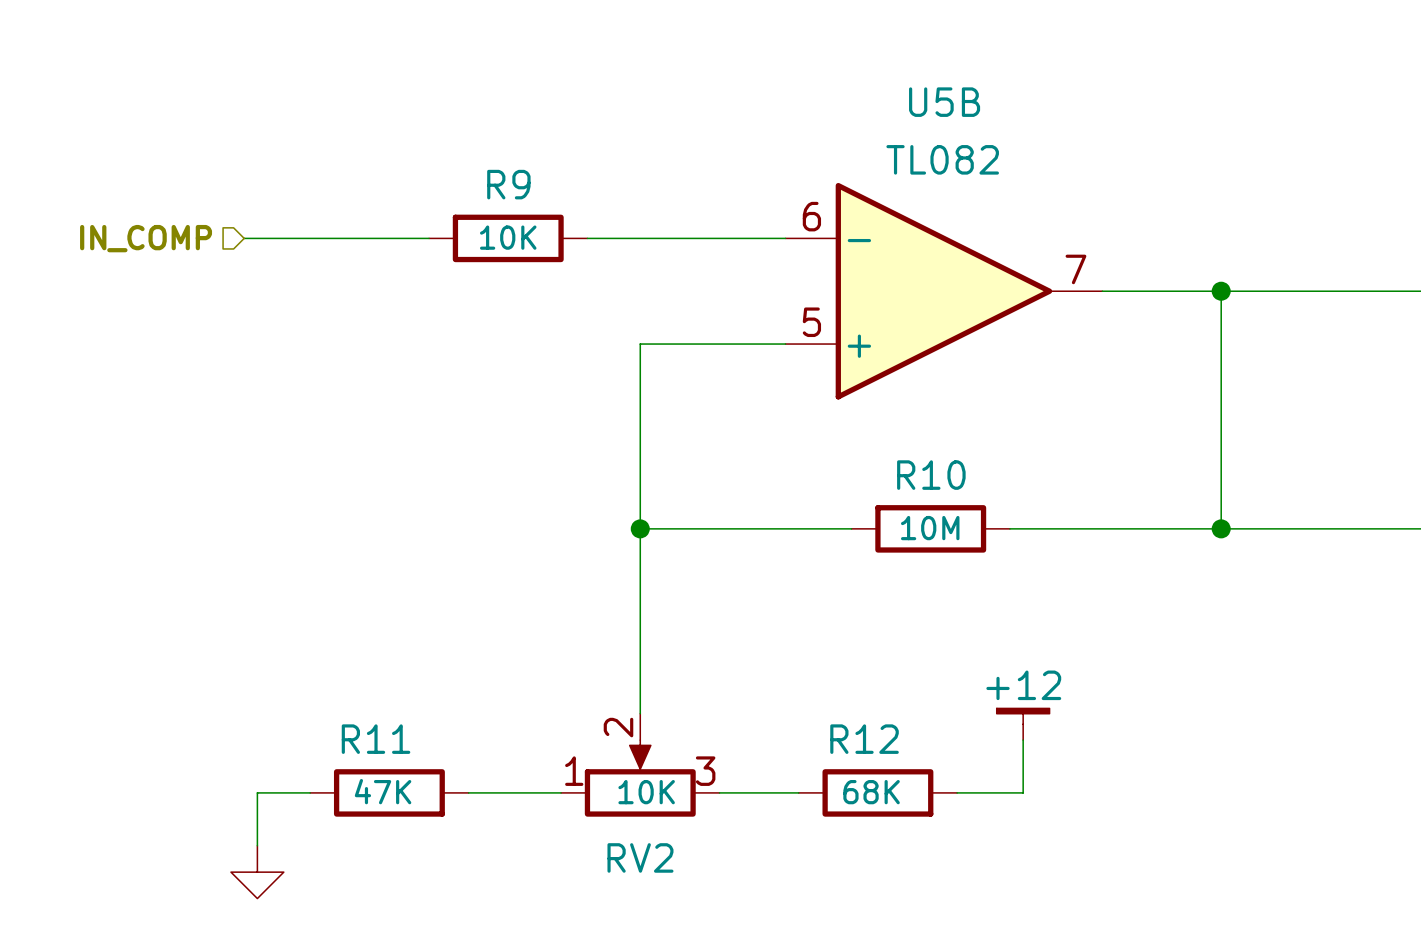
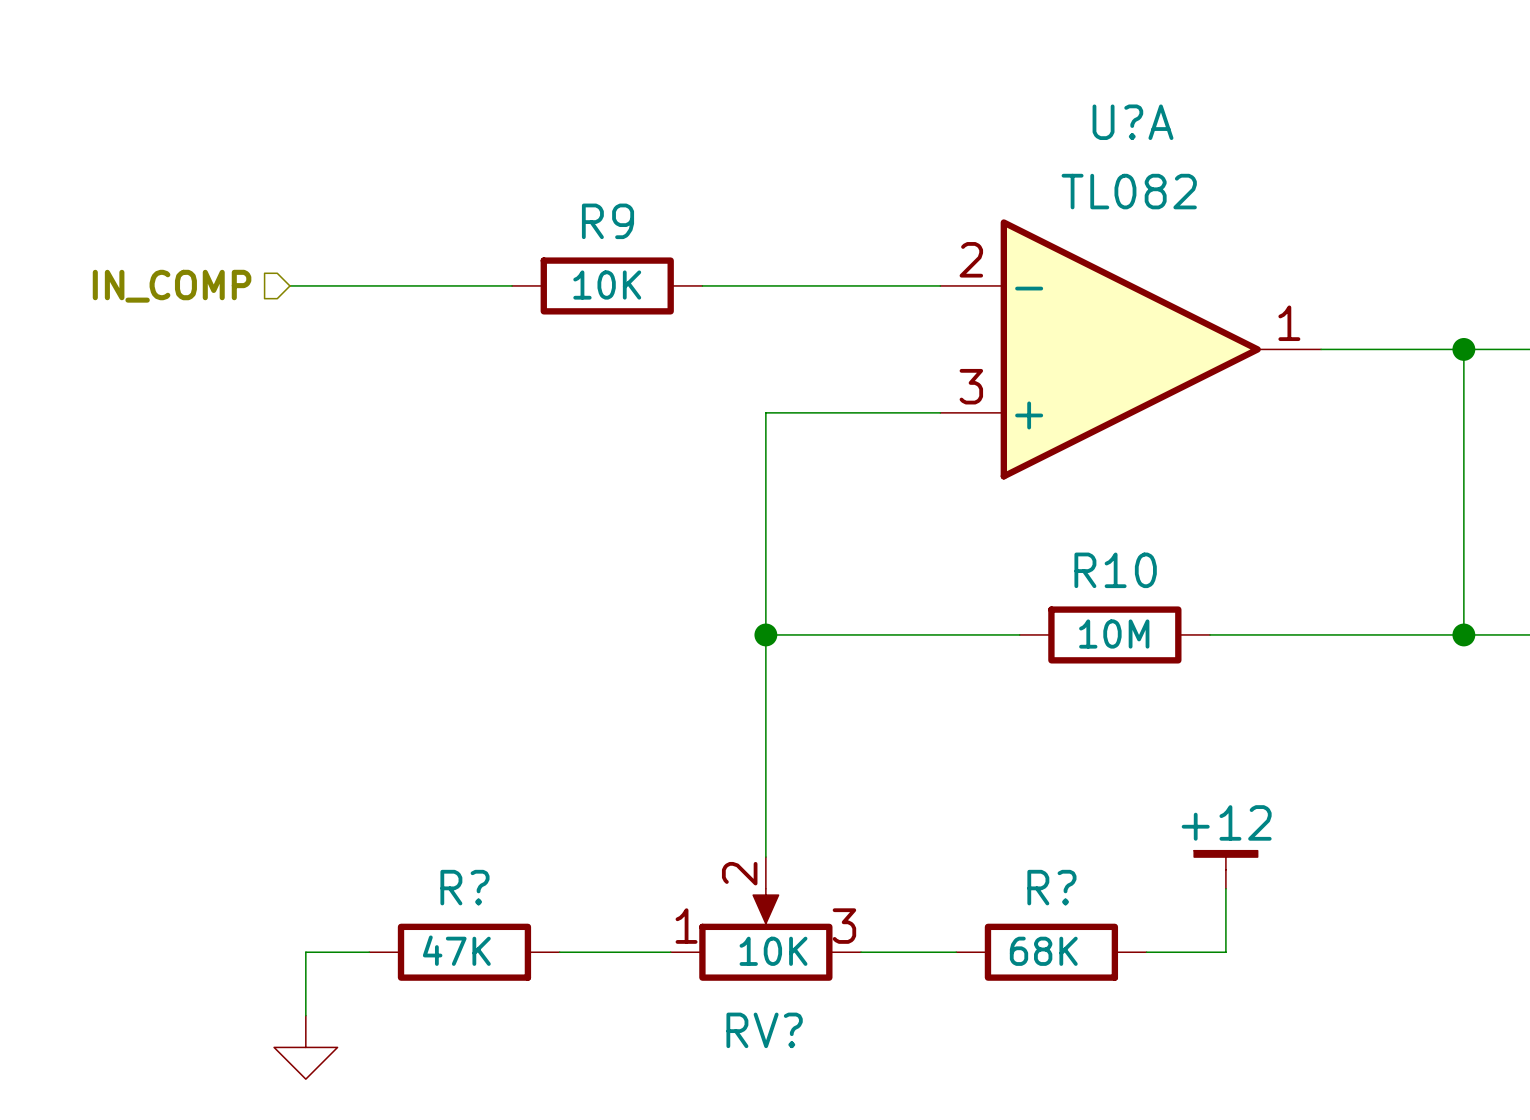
U5B name: U5B (944, 102) -> U?A (1133, 122)
U5B pin number: 6 (811, 216) -> 2 (971, 259)
U5B pin number: 7 (1075, 269) -> 1 (1289, 323)
U5B pin number: 5 (811, 322) -> 3 (971, 386)
R11 name: R11 (376, 739) -> R? (464, 887)
R12 name: R12 (864, 739) -> R? (1051, 887)
RV2 name: RV2 (640, 857) -> RV? (764, 1030)

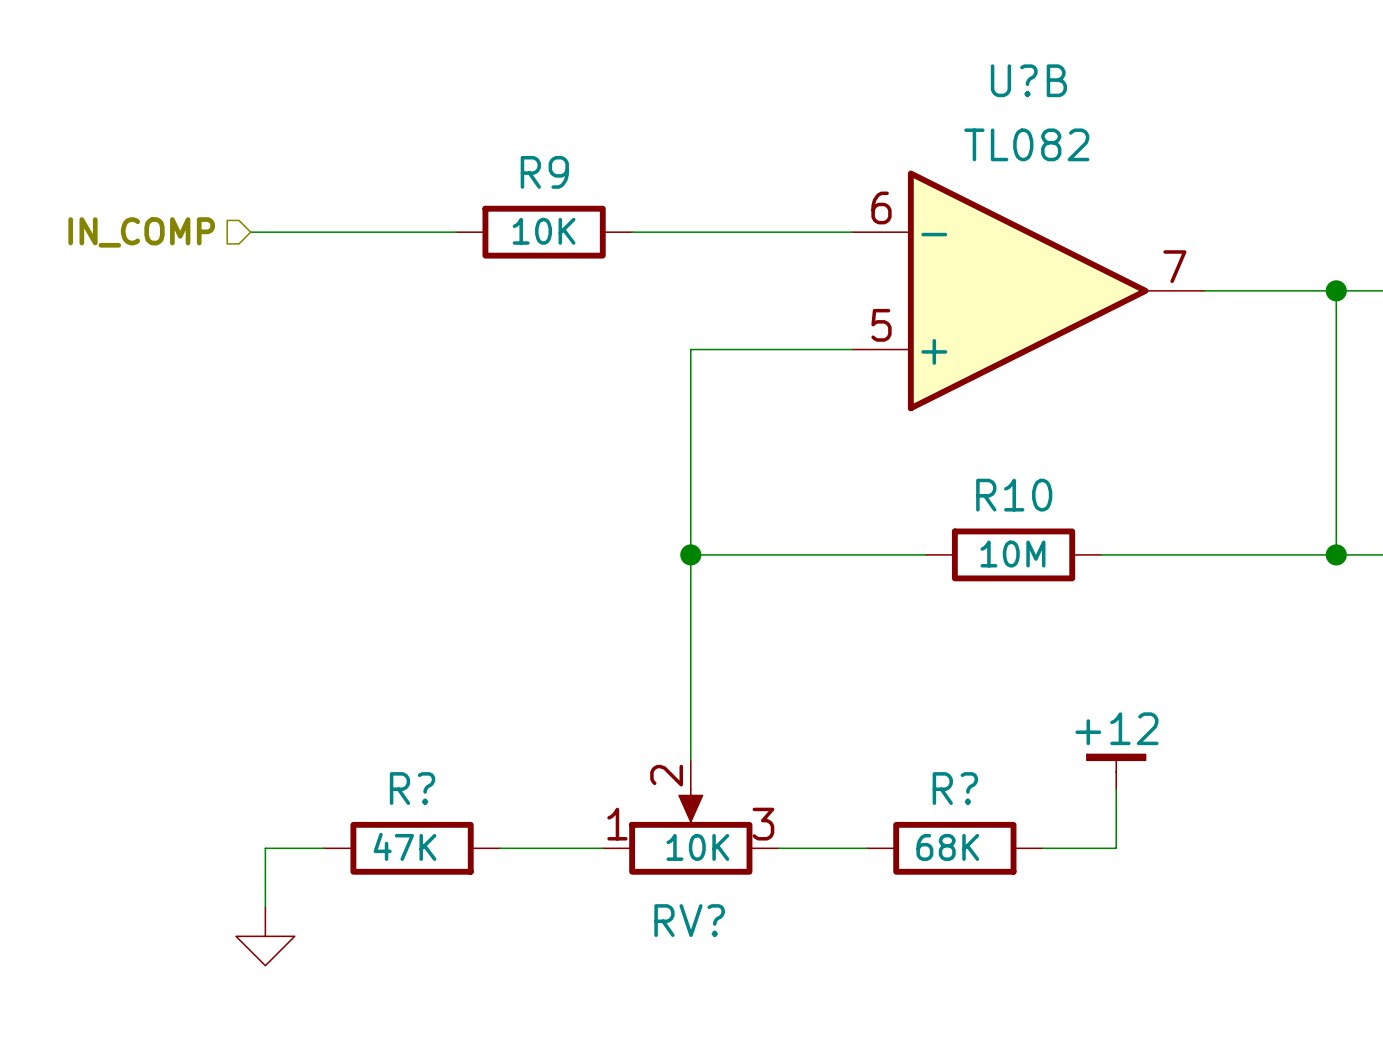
U?A name: U?A (1133, 122) -> U?B (1028, 80)
U?A pin number: 2 (971, 259) -> 6 (881, 207)
U?A pin number: 1 (1289, 323) -> 7 (1174, 266)
U?A pin number: 3 (971, 386) -> 5 (881, 325)

